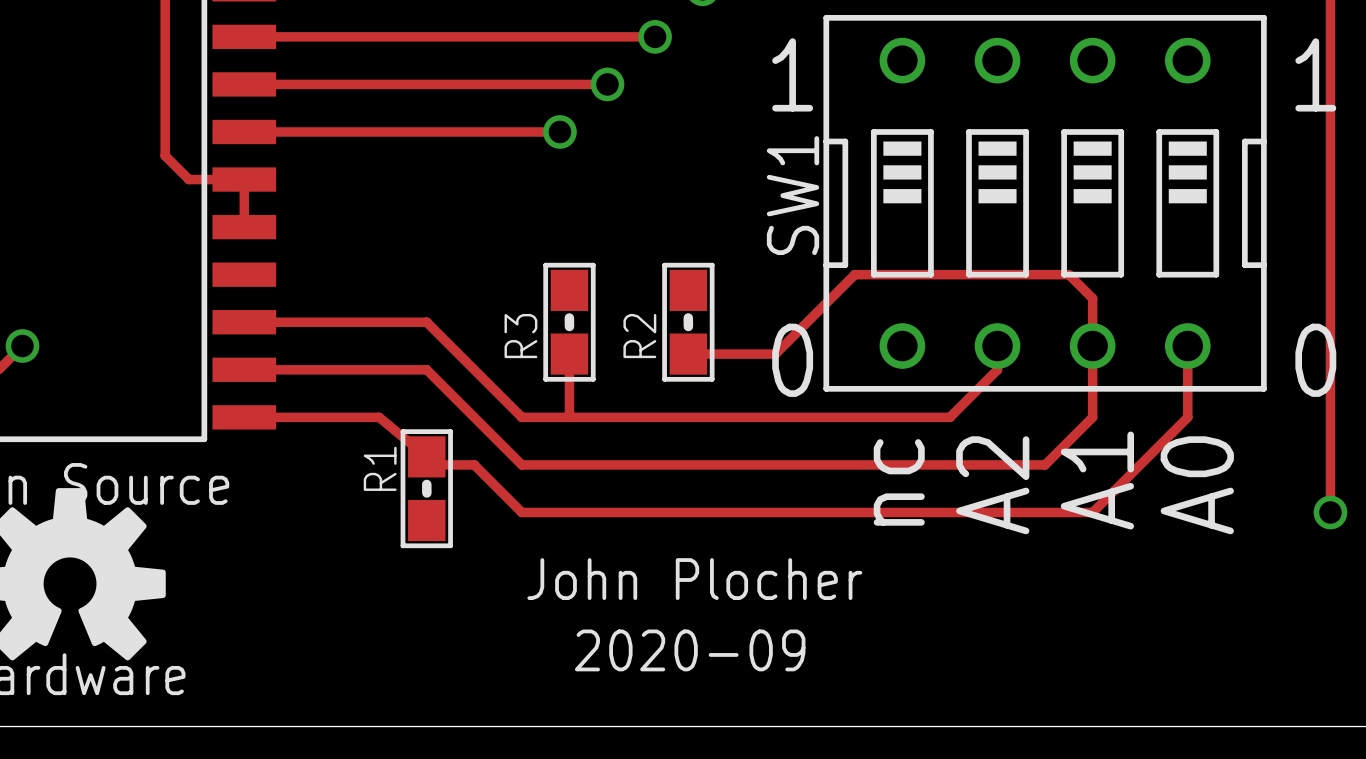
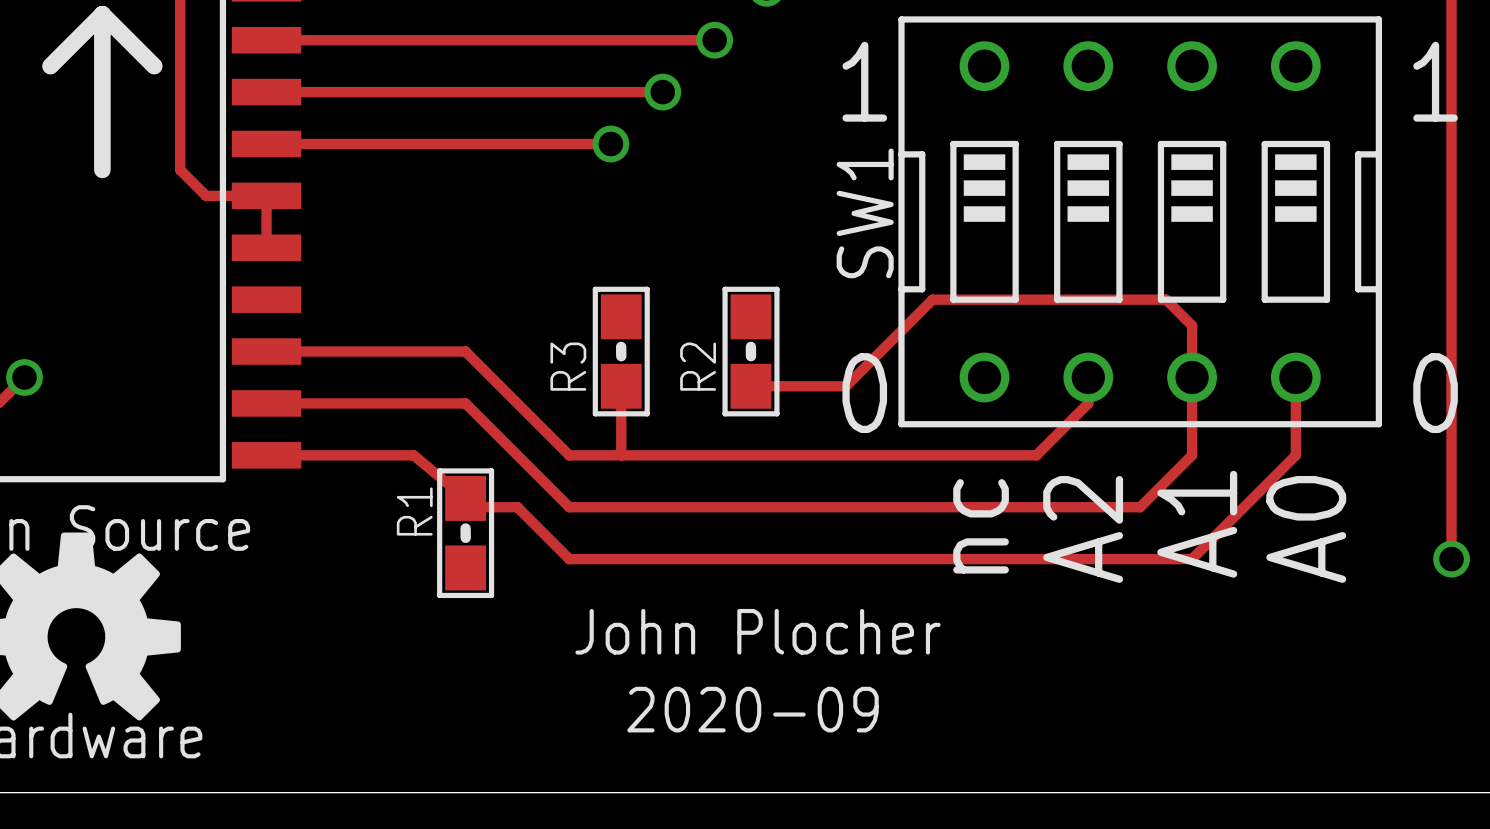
line: none -> (102, 14) (102, 169)
line: none -> (102, 14) (154, 66)
line: none -> (102, 14) (50, 66)

